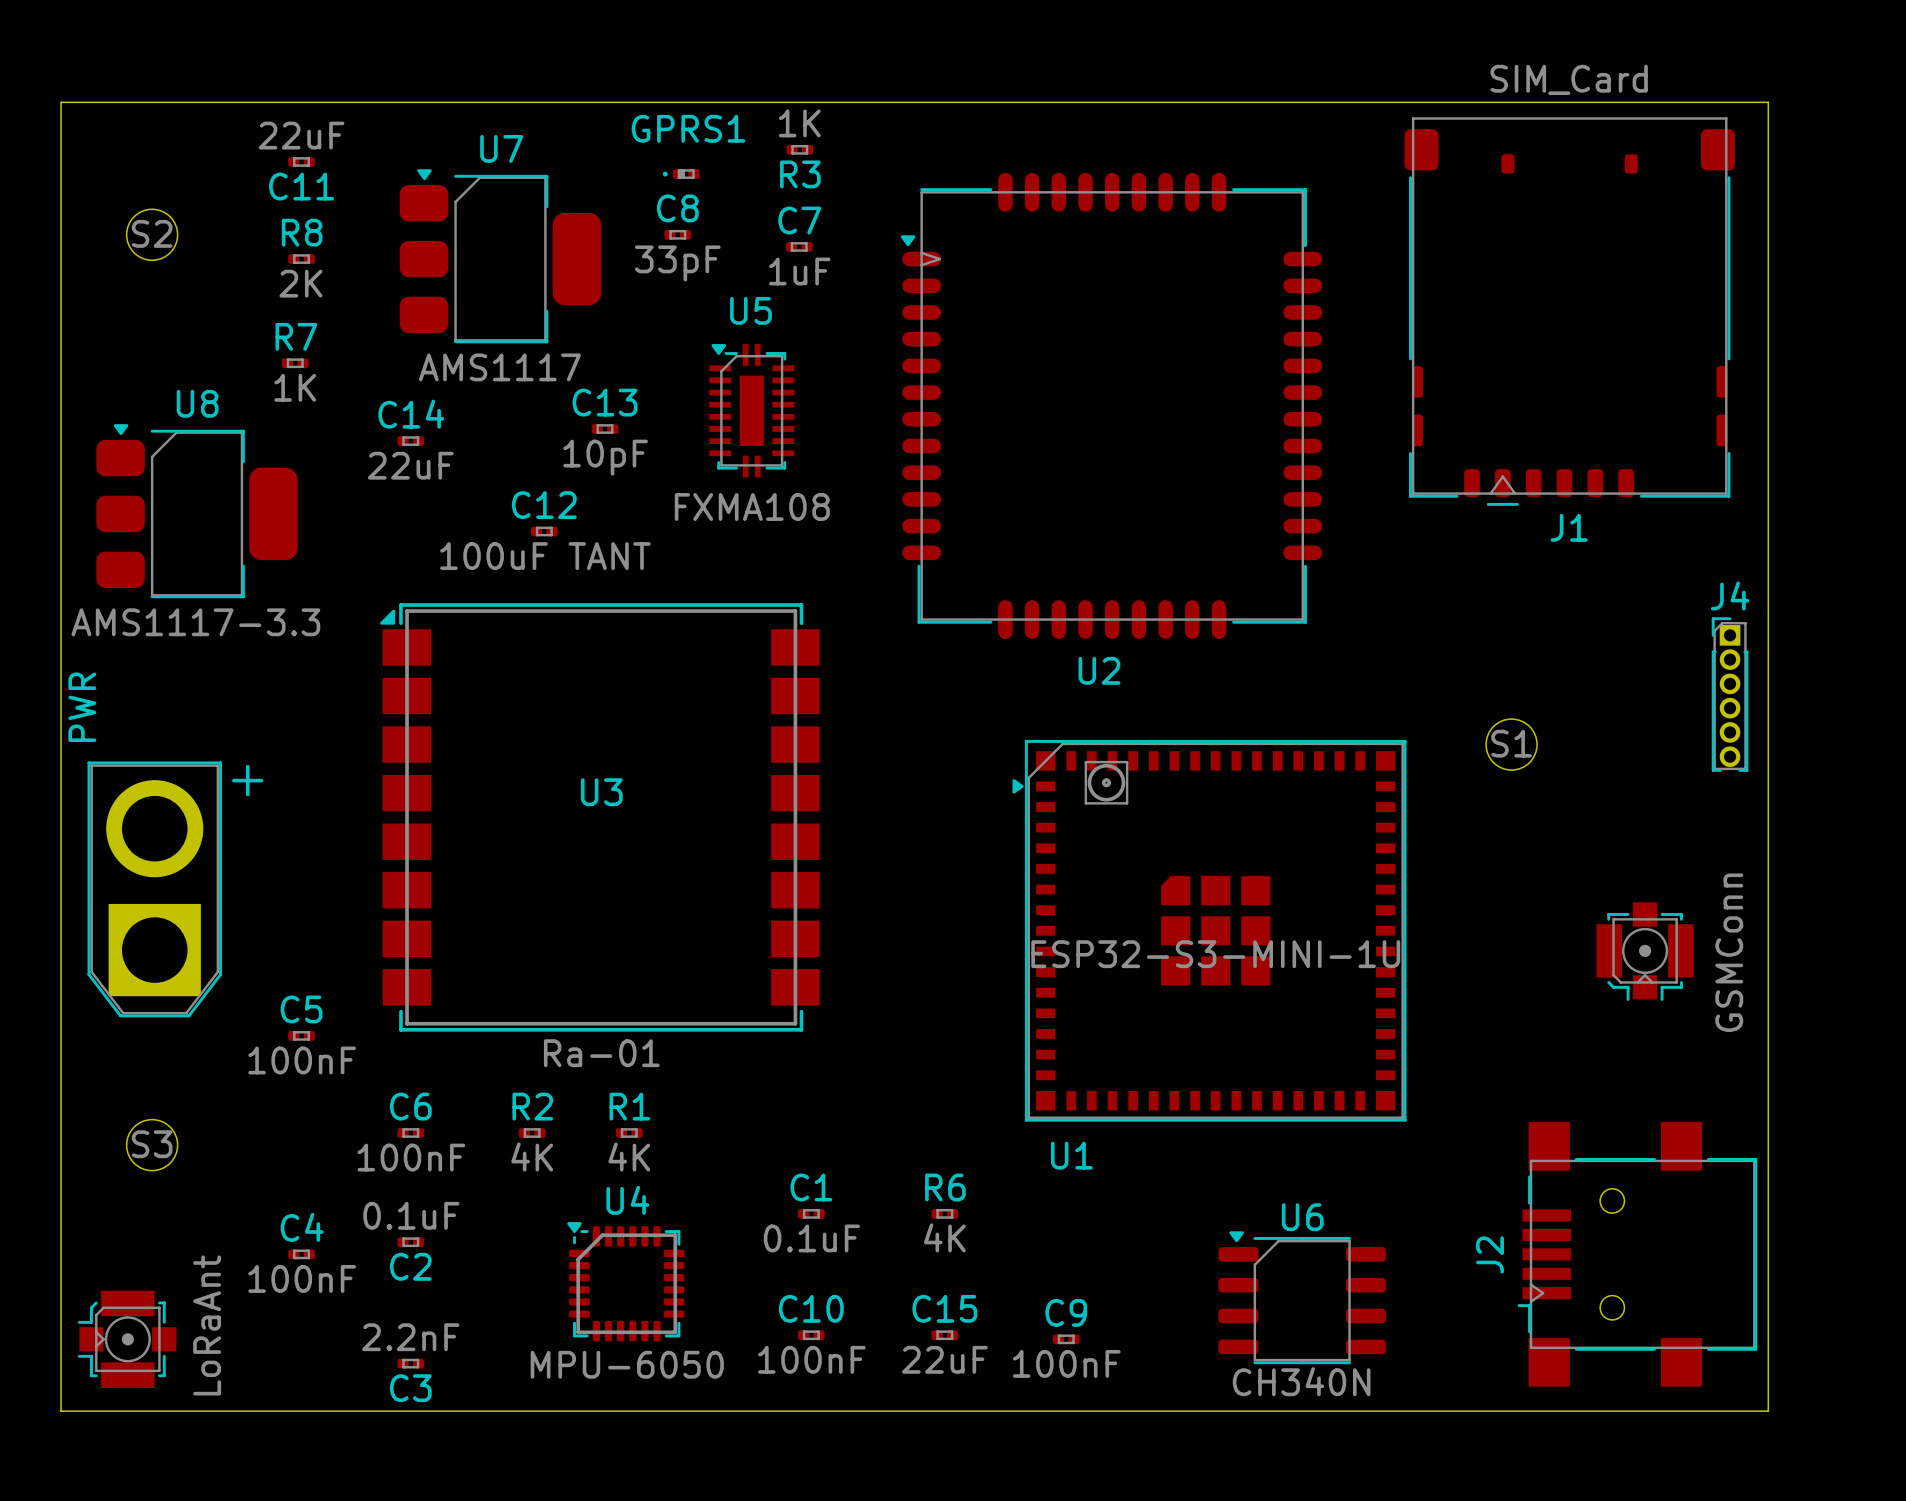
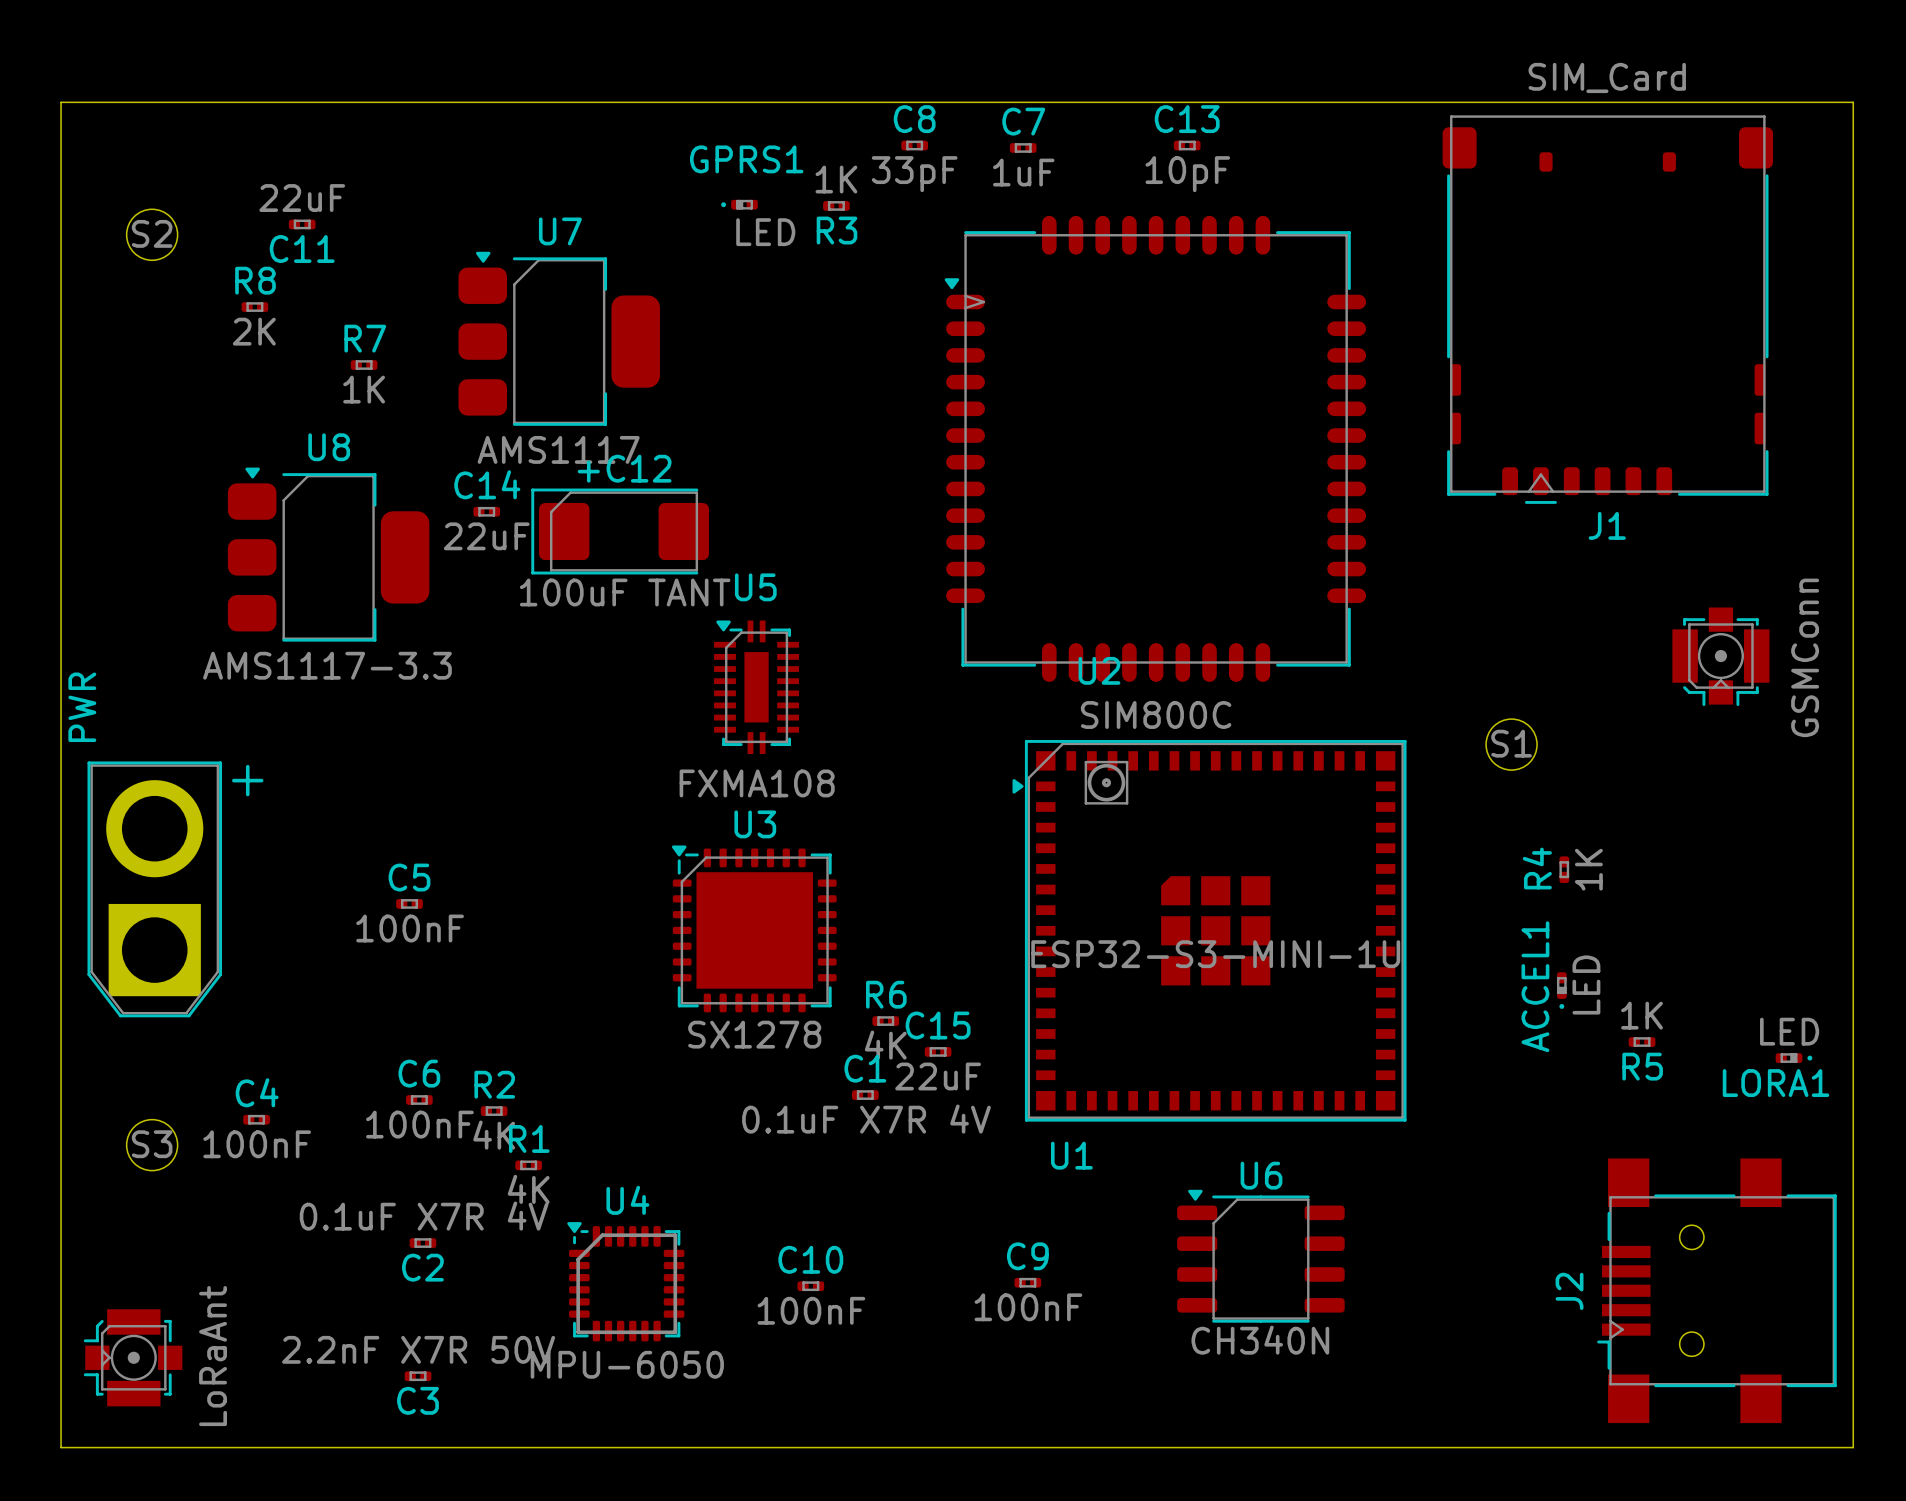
board edge: (1768, 102) (1768, 1411) (61, 1411) -> (1768, 102) (1853, 102) (1853, 1447) (61, 1447) (61, 1411)
R3 position: (799, 149) -> (836, 205)
C11 position: (301, 161) -> (302, 224)
GPRS1 position: (681, 174) -> (739, 204)
GPRS1 value: none -> LED (765, 232)
C8 position: (677, 234) -> (914, 145)
C7 position: (799, 246) -> (1023, 147)
U7 position: (500, 256) -> (559, 338)
R8 position: (301, 259) -> (254, 307)
J1 position: (1569, 311) -> (1607, 309)
R7 position: (295, 363) -> (364, 365)
U2 position: (1111, 405) -> (1155, 448)
U5 position: (751, 410) -> (756, 687)
C13 position: (604, 428) -> (1187, 145)
C14 position: (410, 441) -> (486, 511)
U8 position: (197, 511) -> (328, 554)
C12: 100uF TANT (544, 531) -> none
+C12: none -> 100uF TANT (620, 531)
U3 footprint: [380, 603, 820, 1032] -> [671, 845, 837, 1013]
J4: (1730, 694) -> none
U2 value: none -> SIM800C (1156, 715)
U3 name position: U3 (601, 792) -> U3 (755, 824)
R4: none -> 1K (1564, 869)
part position: (1645, 951) -> (1720, 656)
ACCEL1: none -> LED (1561, 990)
C5 position: (301, 1035) -> (409, 903)
R5: none -> 1K (1642, 1042)
U3 value: Ra-01 (601, 1053) -> SX1278 (754, 1034)
LORA1: none -> LED (1793, 1058)
C6 position: (410, 1132) -> (419, 1100)
R2 position: (532, 1132) -> (494, 1111)
R1 position: (629, 1132) -> (528, 1165)
C1 position: (811, 1213) -> (865, 1095)
R6 position: (944, 1213) -> (885, 1021)
C2 value: 0.1uF (411, 1215) -> 0.1uF X7R 4V (424, 1216)
C1 value: 0.1uF (811, 1238) -> 0.1uF X7R 4V (866, 1119)
C2 position: (410, 1242) -> (422, 1243)
C4 position: (301, 1254) -> (256, 1119)
J2 position: (1637, 1254) -> (1716, 1290)
U6 position: (1302, 1297) -> (1260, 1256)
part value position: LoRaAnt (207, 1325) -> LoRaAnt (213, 1356)
C10 position: (811, 1335) -> (810, 1286)
C15 position: (944, 1335) -> (938, 1051)
C3 value: 2.2nF (410, 1337) -> 2.2nF X7R 50V (418, 1349)
part position: (127, 1339) -> (133, 1357)
C9 position: (1066, 1339) -> (1027, 1282)
C3 position: (410, 1363) -> (418, 1376)

